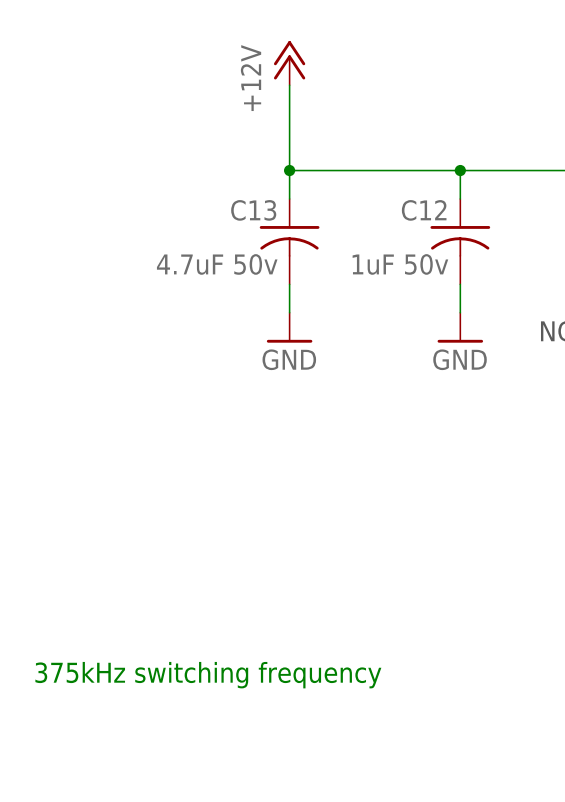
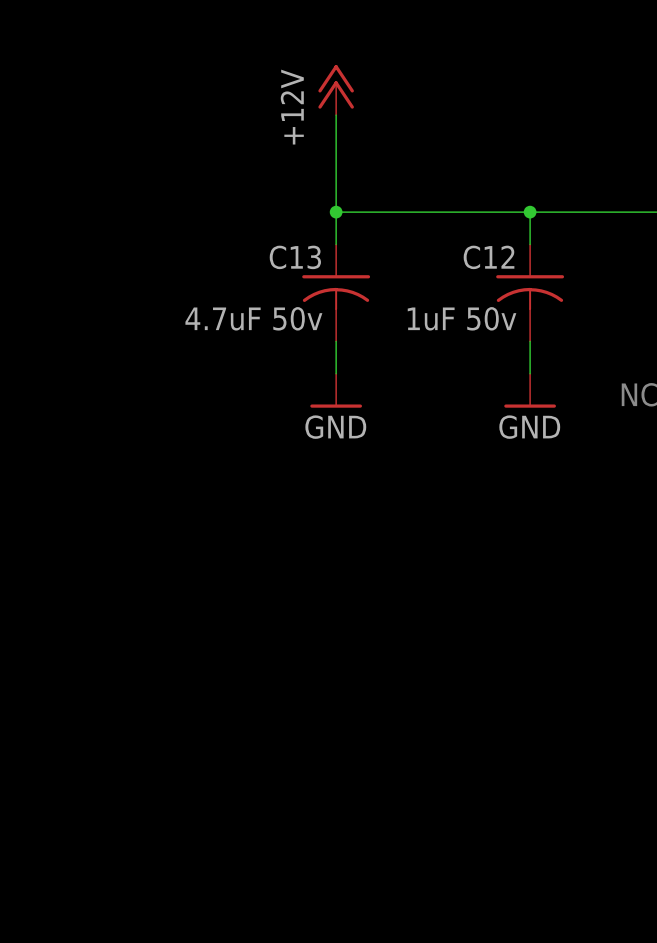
text: 375kHz switching frequency (208, 675) -> none

